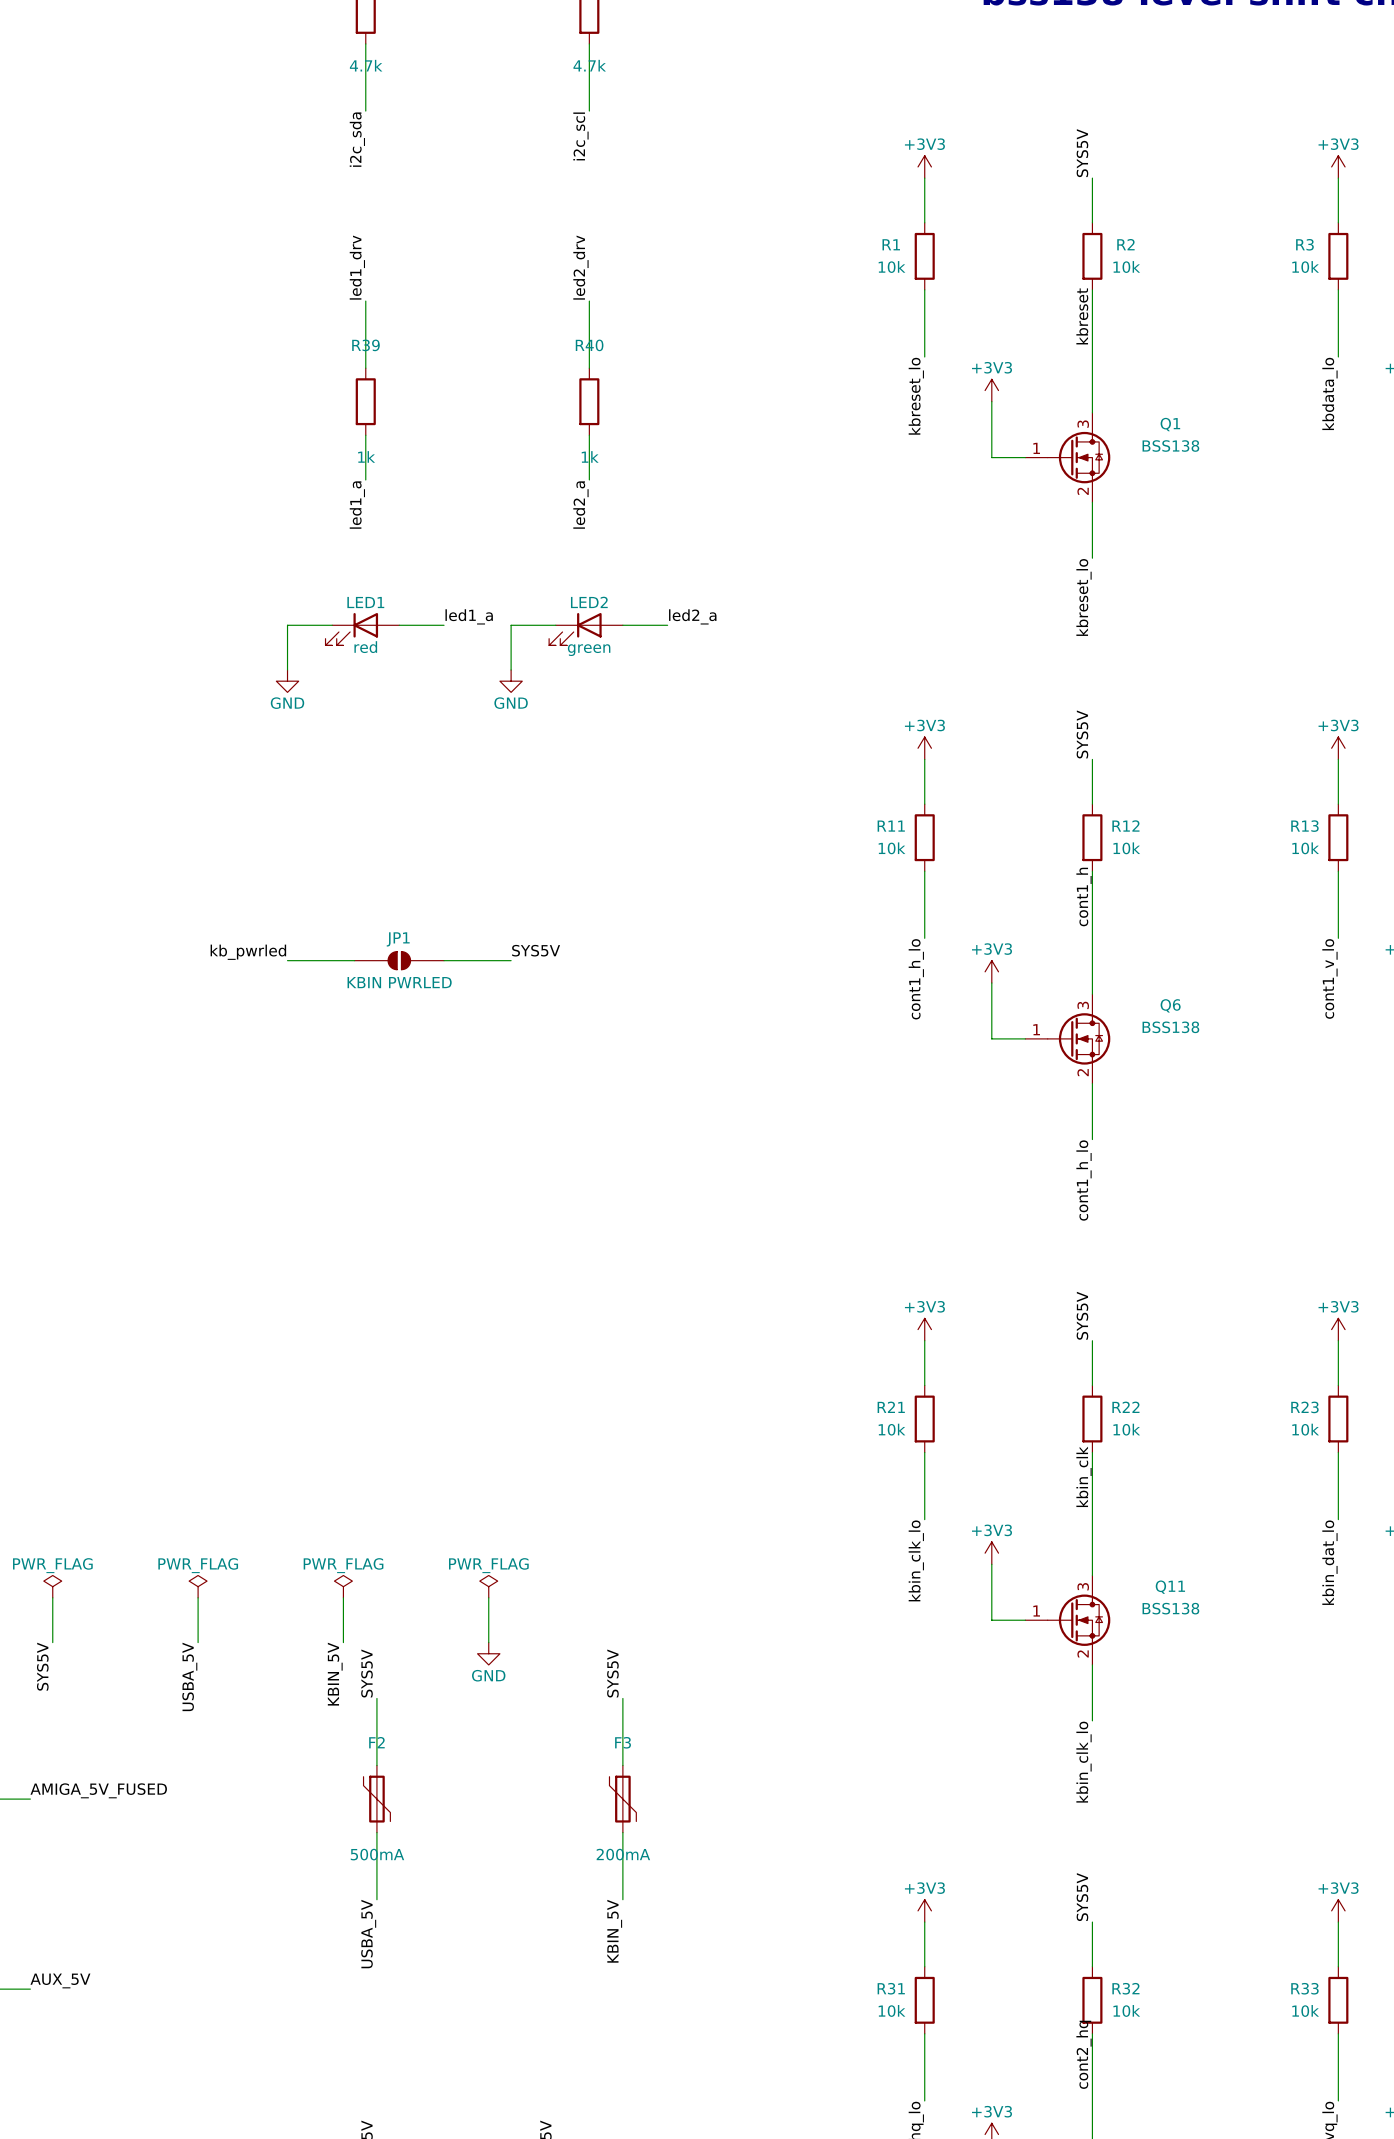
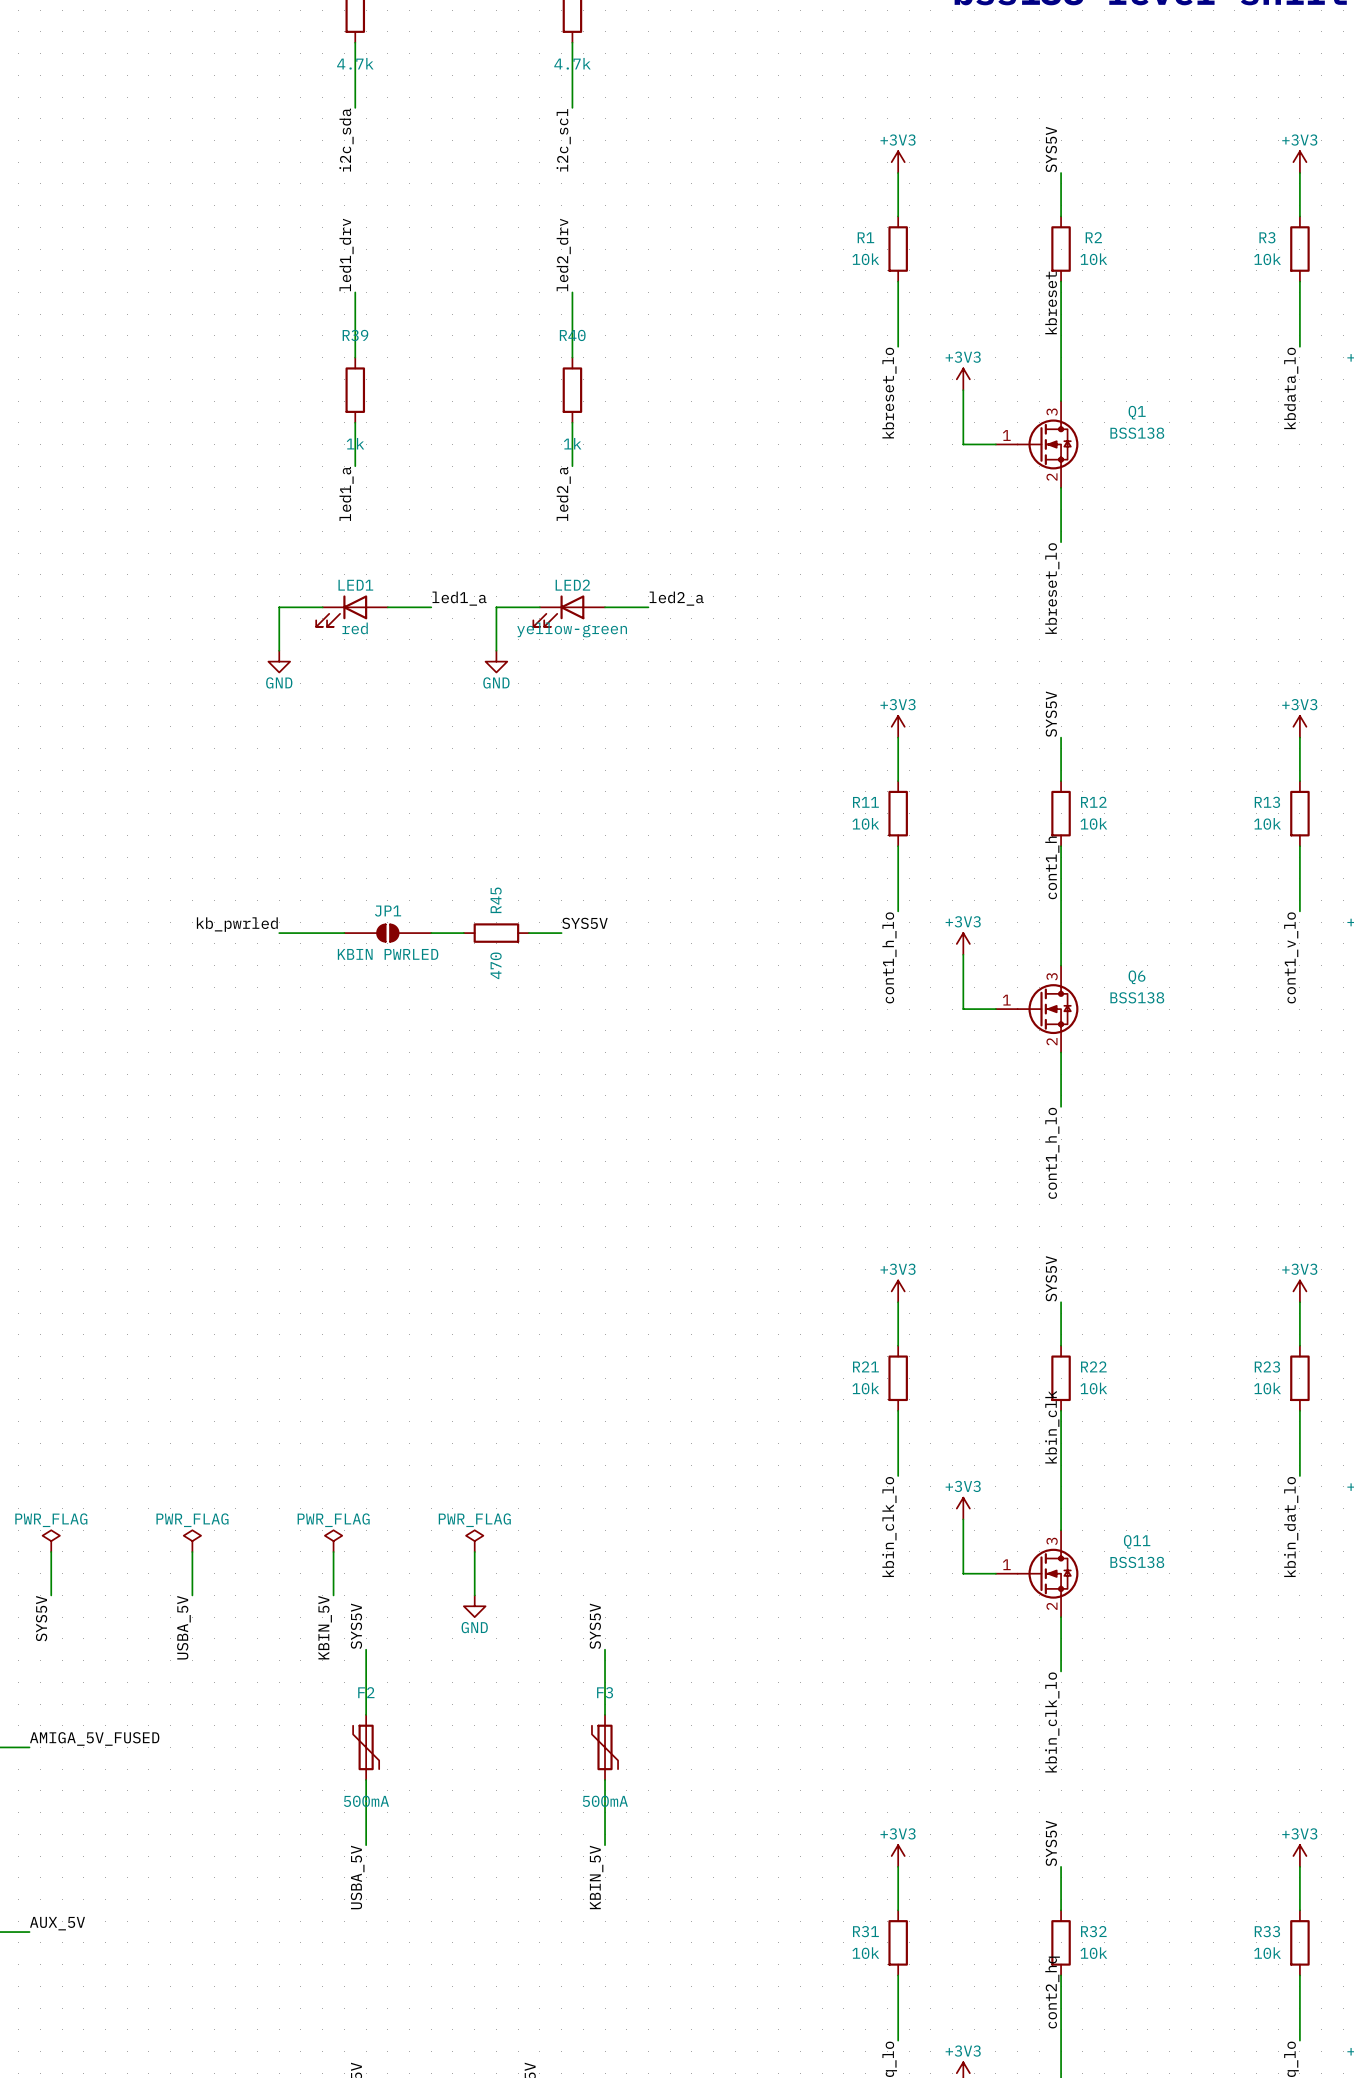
LED2 value: green (589, 650) -> yellow-green (572, 629)
label position: SYS5V (536, 950) -> SYS5V (584, 923)
wire: (477, 960) (511, 960) -> (529, 933) (561, 933)
R45: none -> 470 (496, 933)
F3 value: 200mA (623, 1854) -> 500mA (605, 1801)

